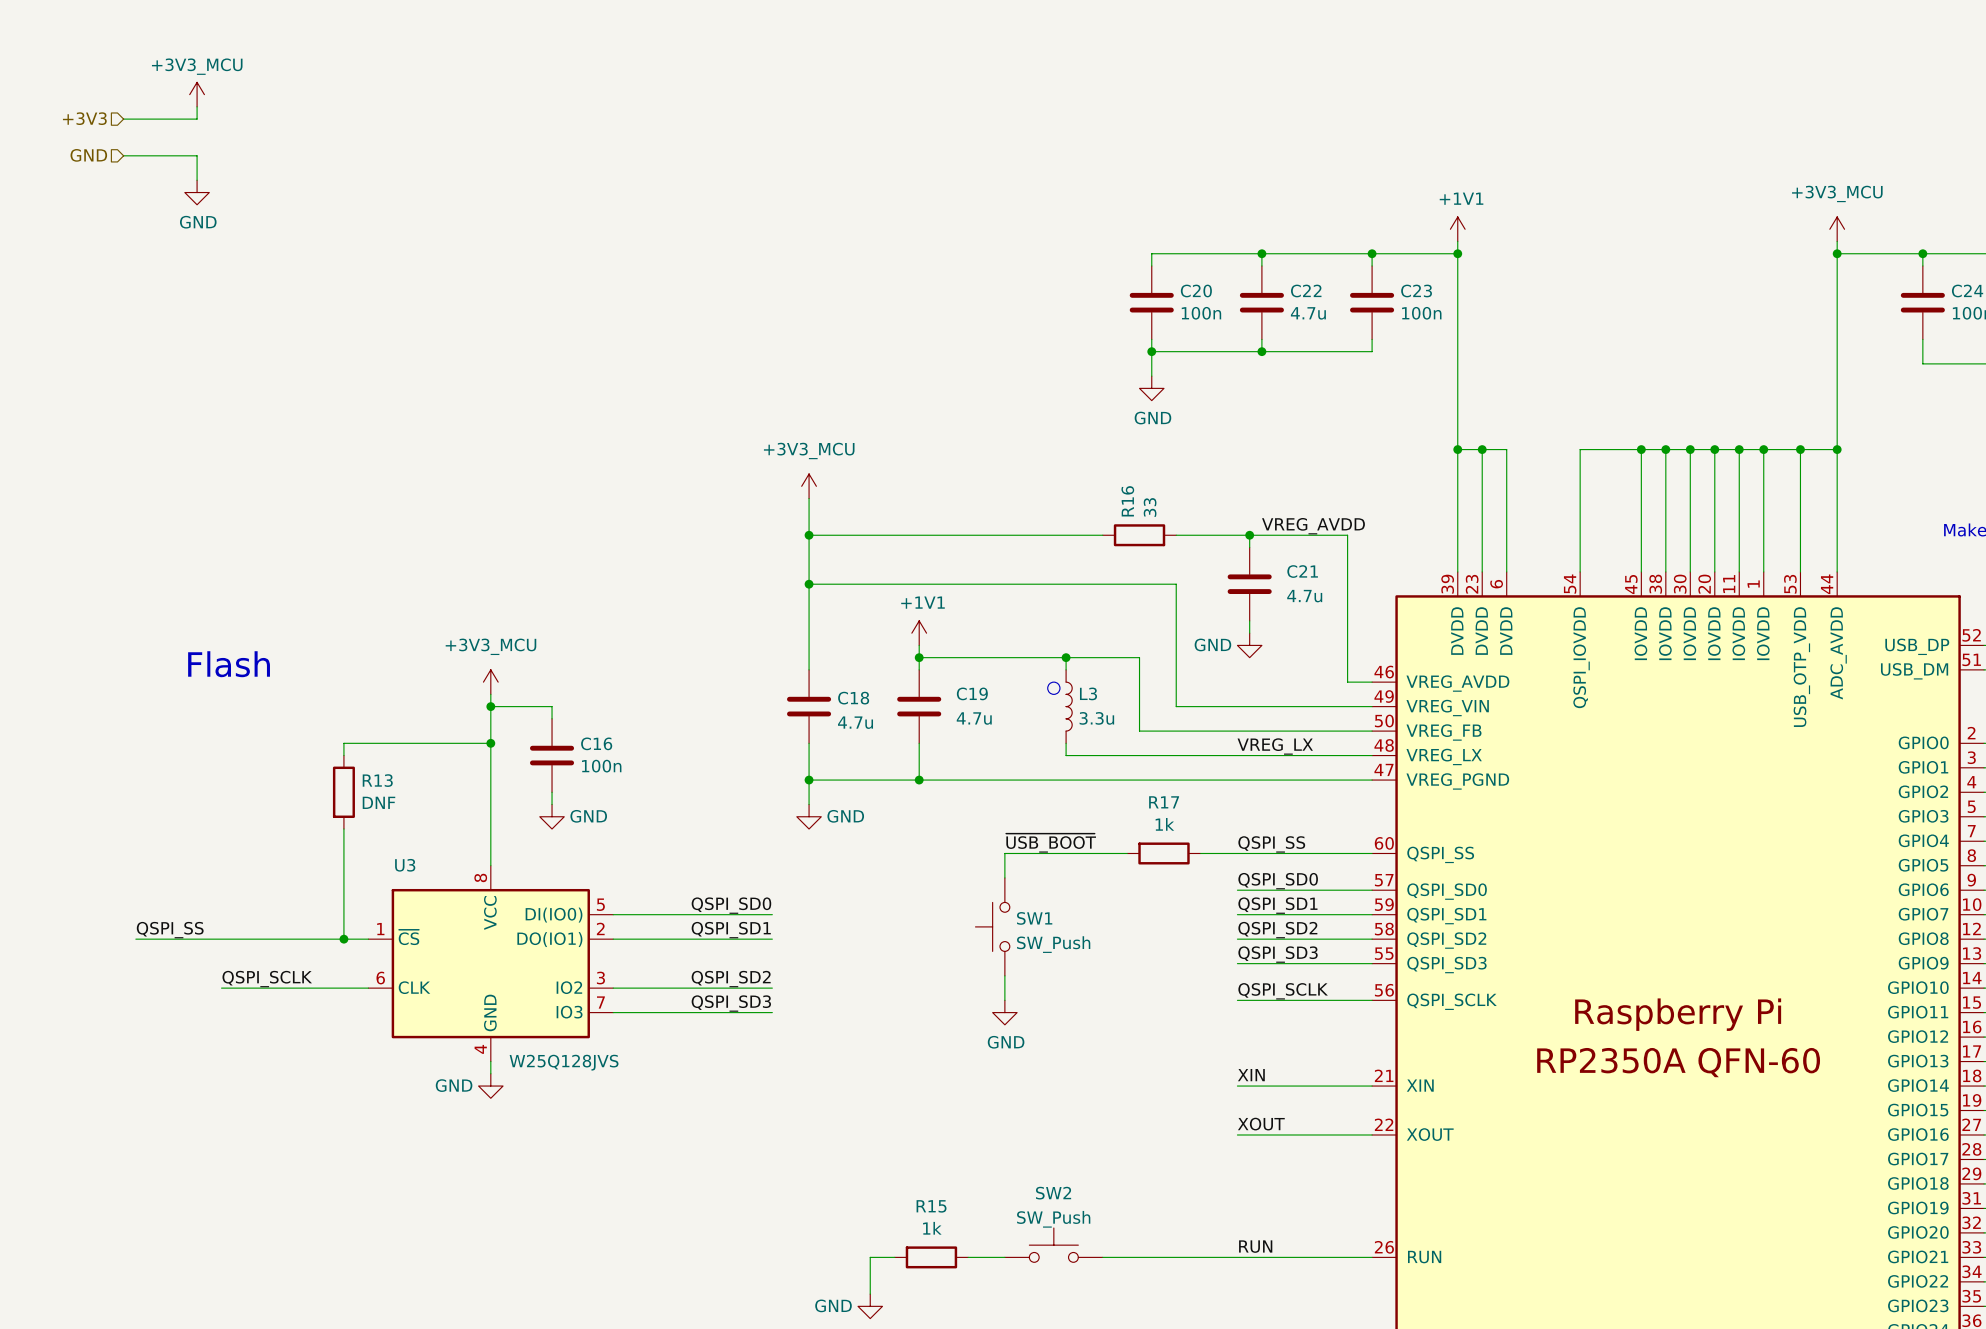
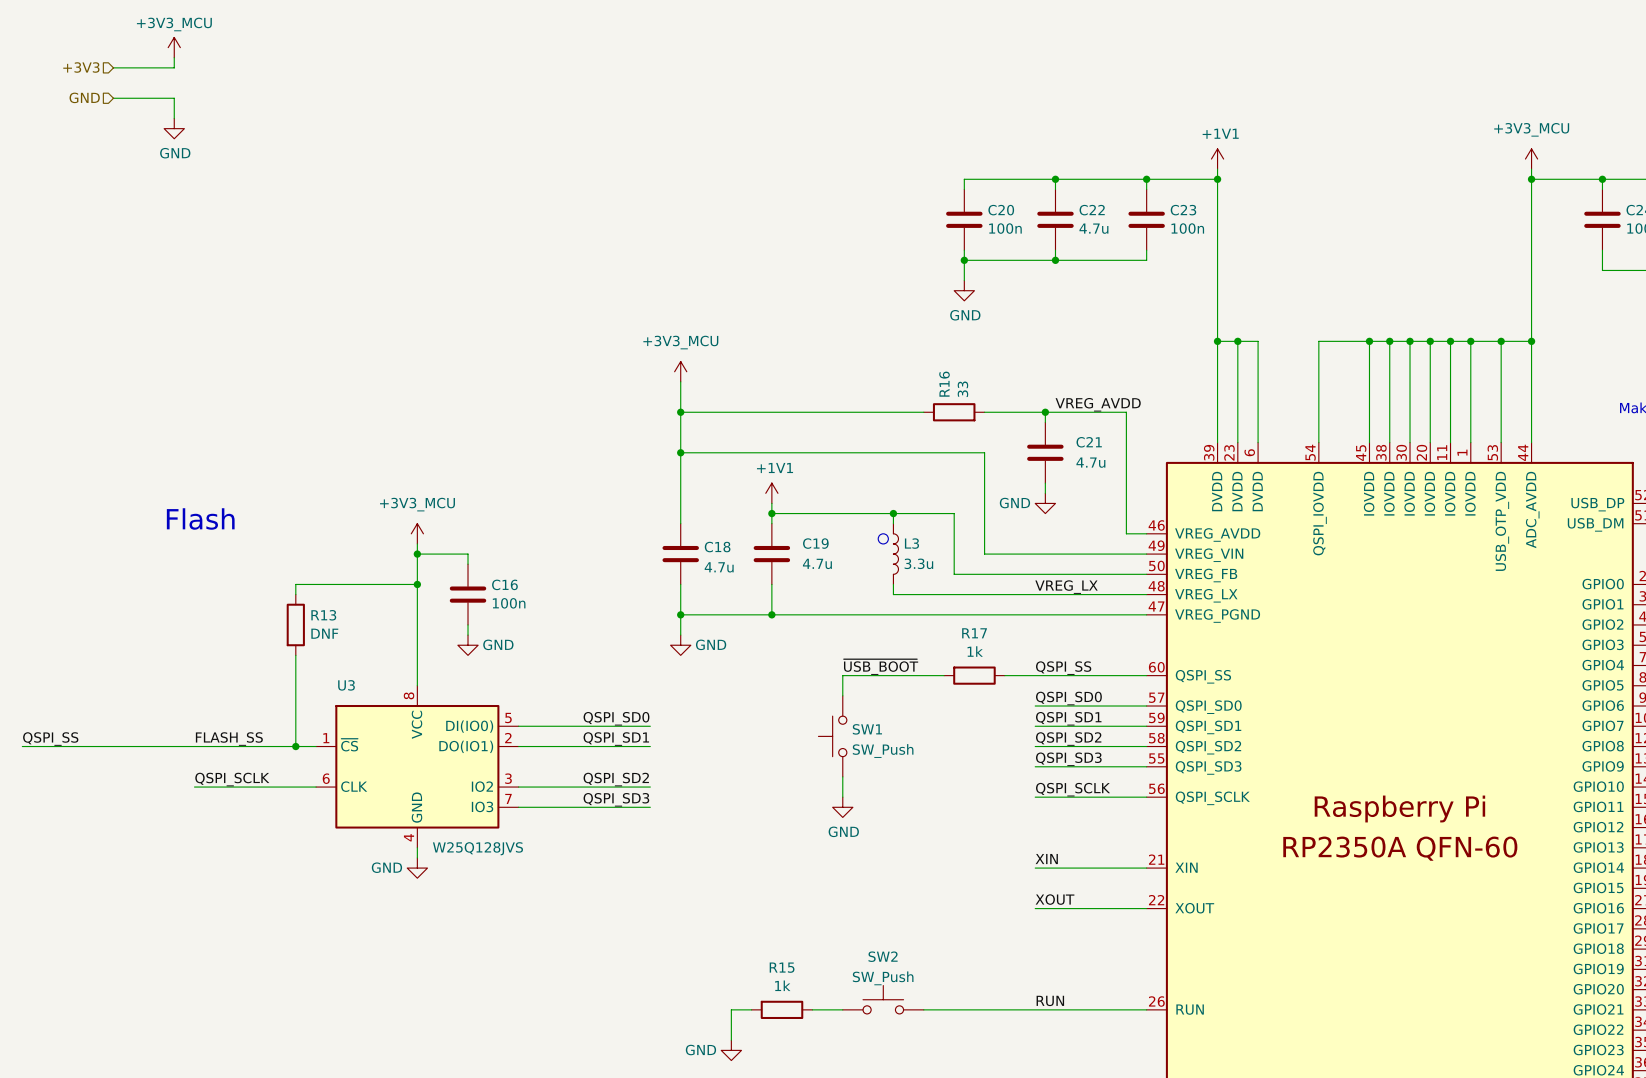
label position: QSPI_SS (170, 930) -> QSPI_SS (50, 739)
label: none -> FLASH_SS (229, 739)
wire: none -> (22, 746) (123, 746)

